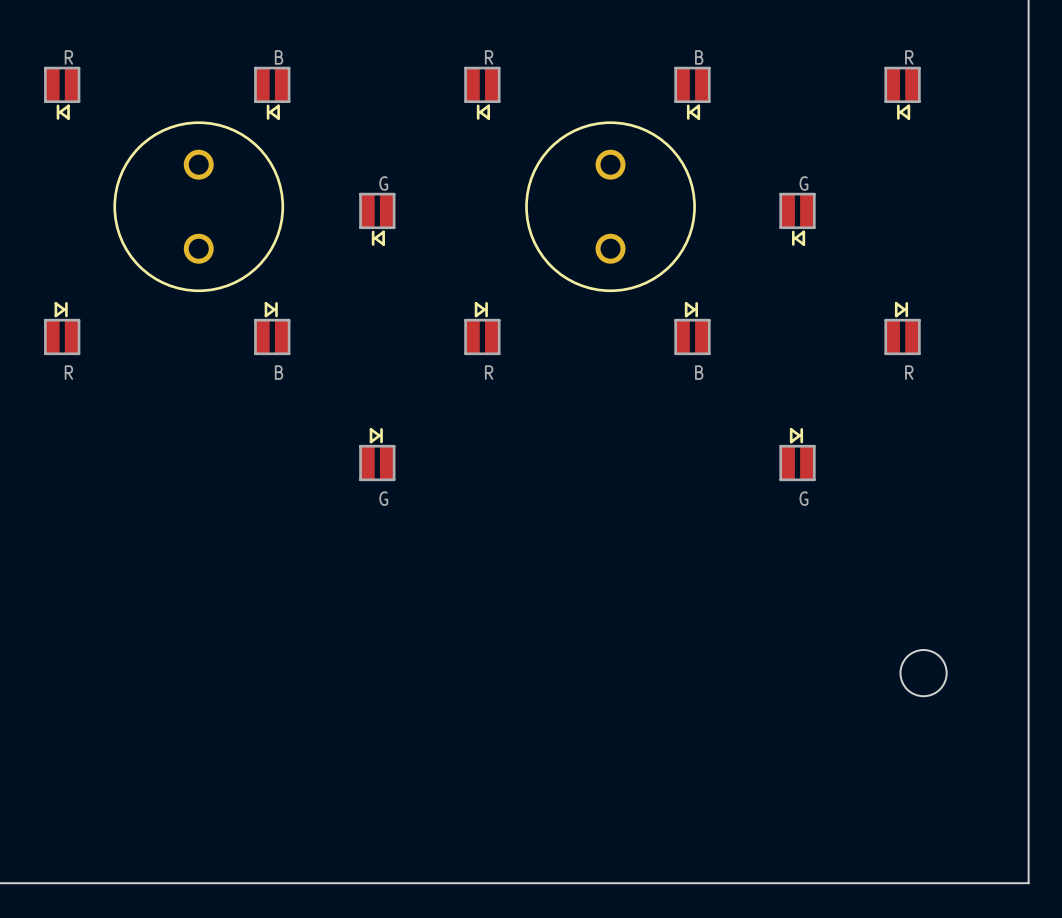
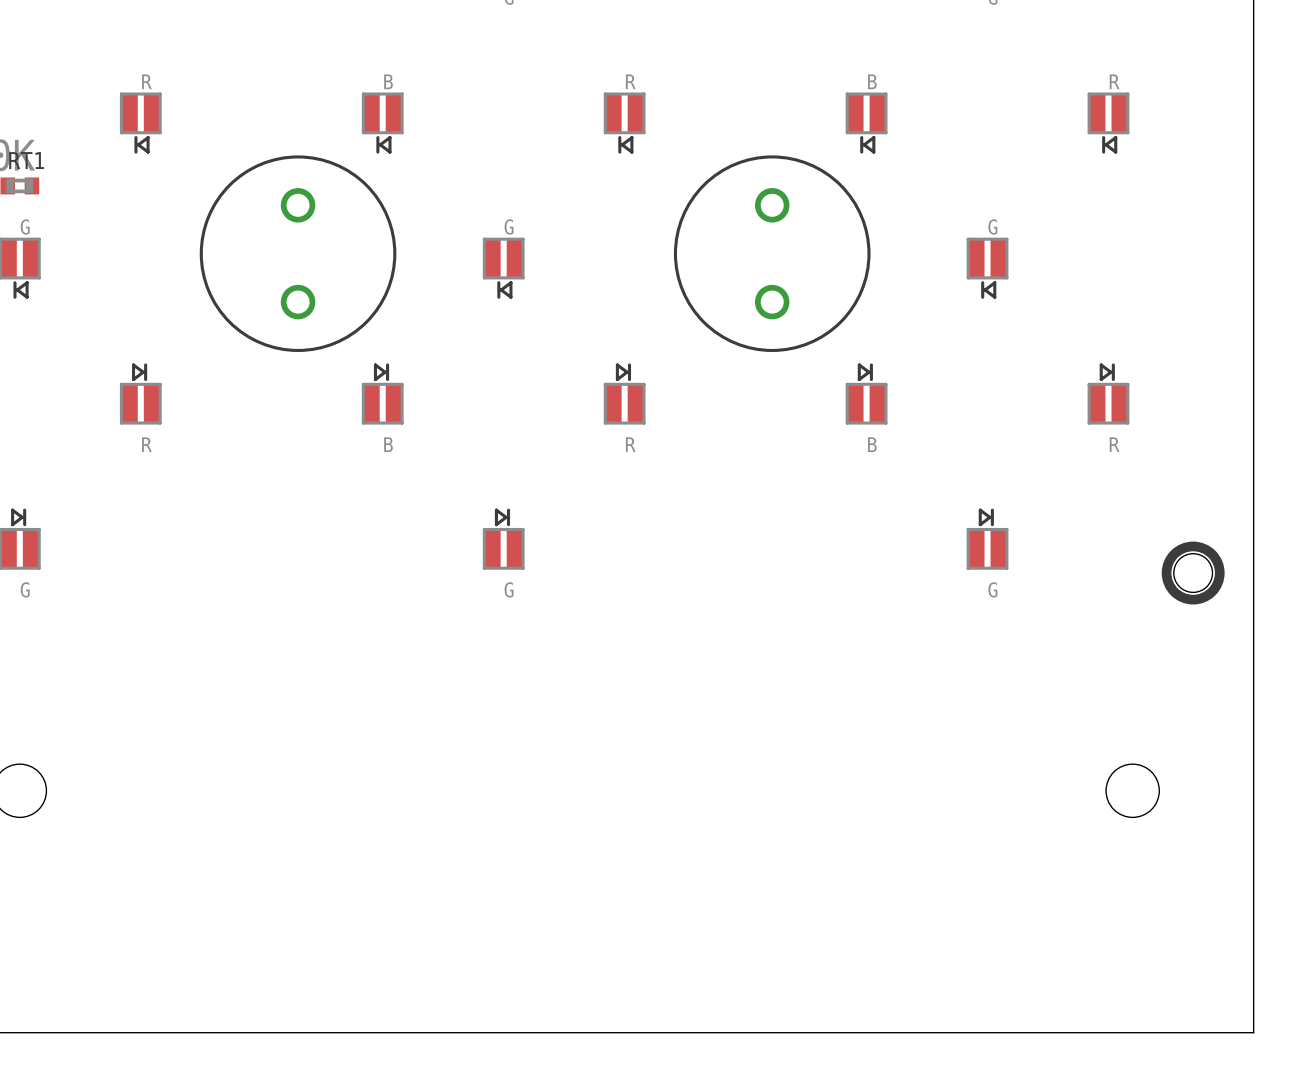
drawing: none -> [1161, 541, 1225, 605]
round board edge: none -> [1173, 553, 1213, 593]

